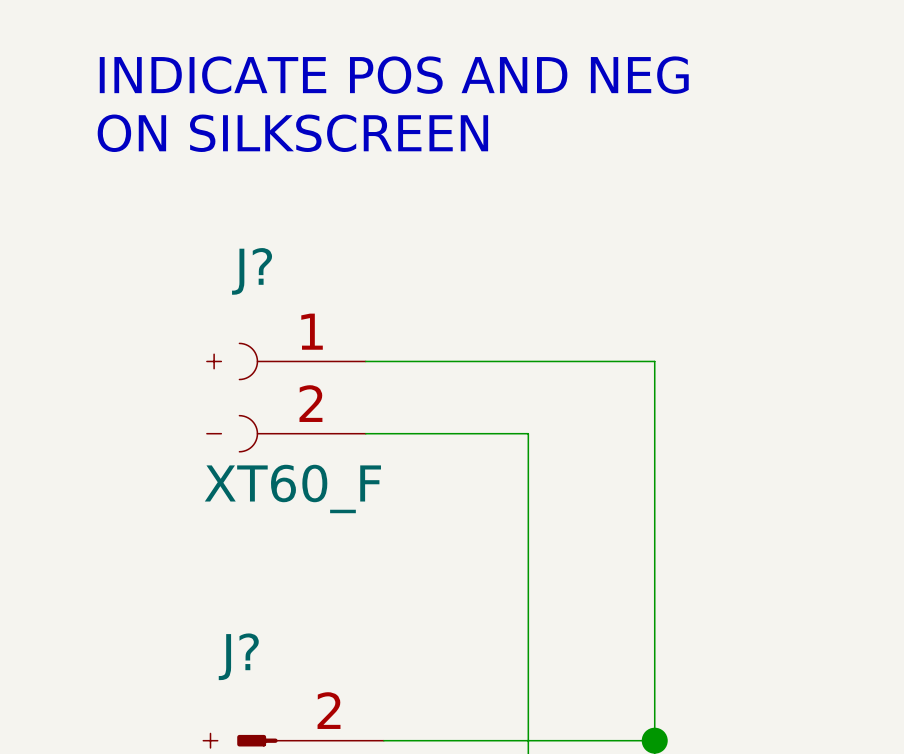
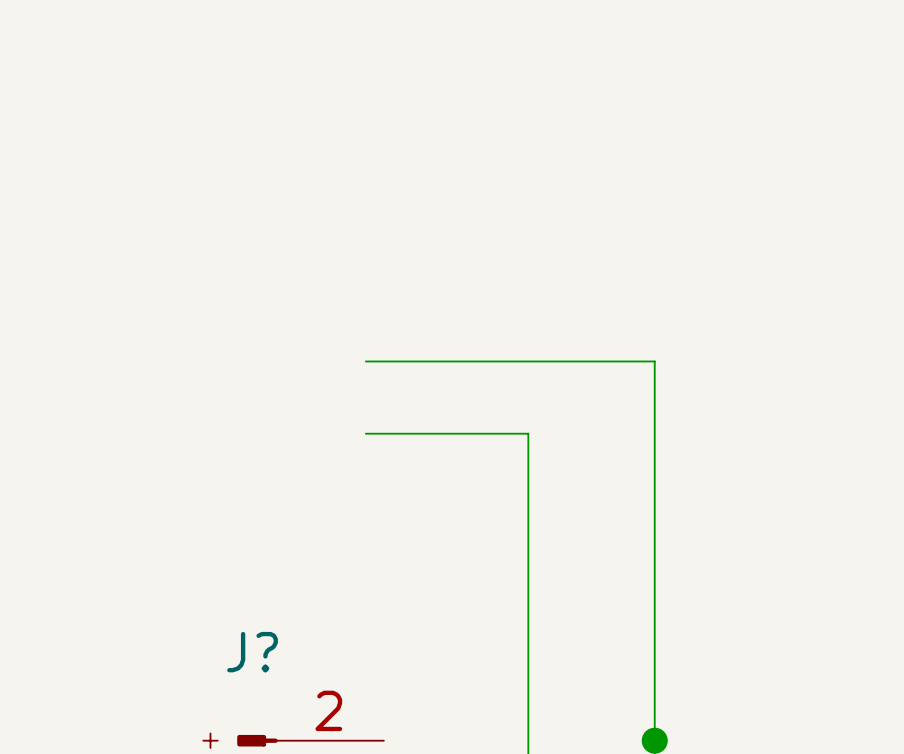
text: INDICATE POS AND NEG (394, 75) -> none
text: ON SILKSCREEN (292, 133) -> none
J?: (286, 397) -> none
wire: (383, 740) (654, 740) -> none

